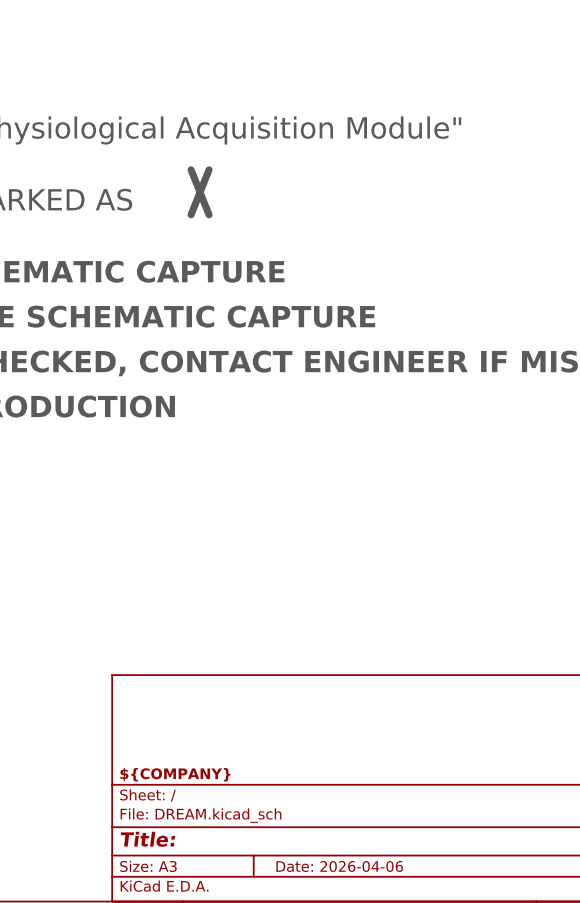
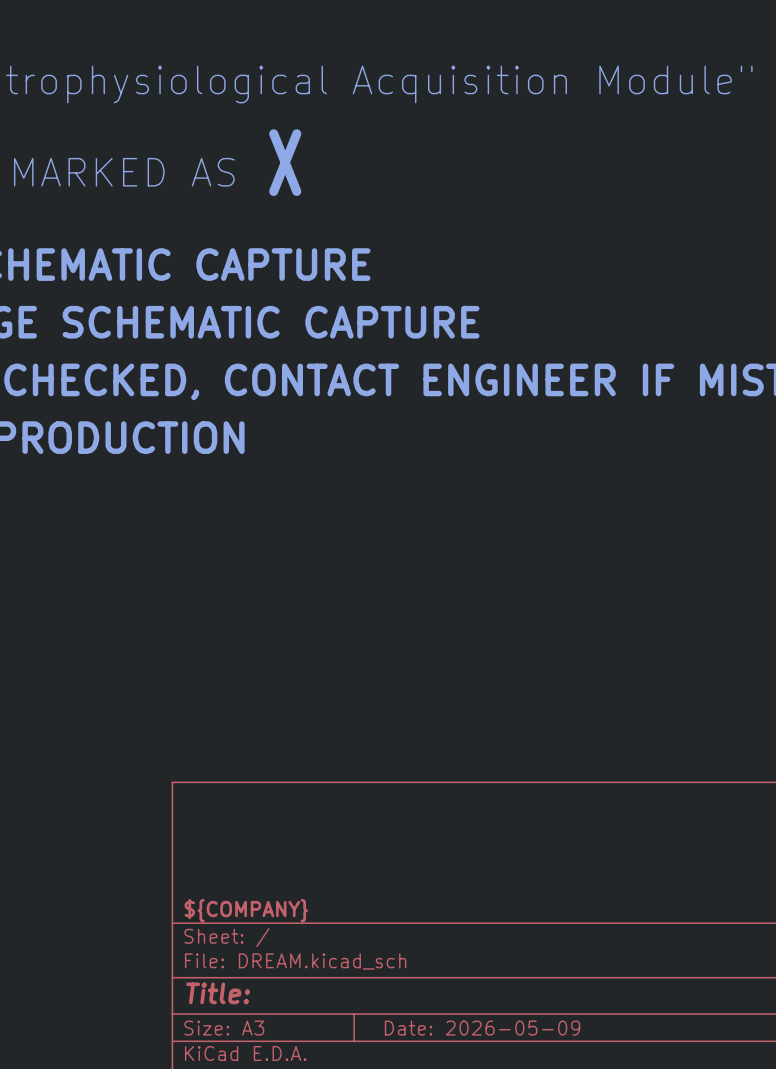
title block: Date: 2026-04-06 (339, 866) -> Date: 2026-05-09 (482, 1028)

